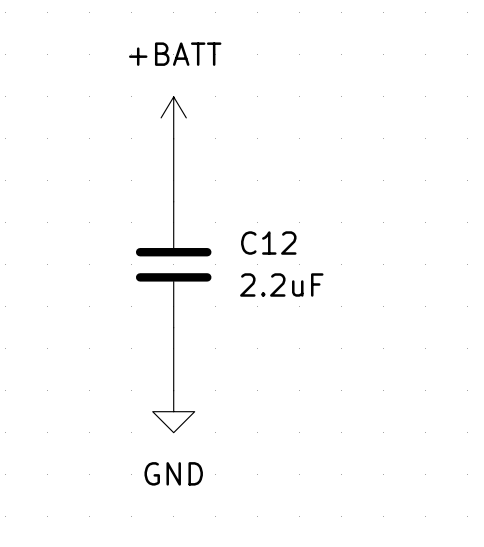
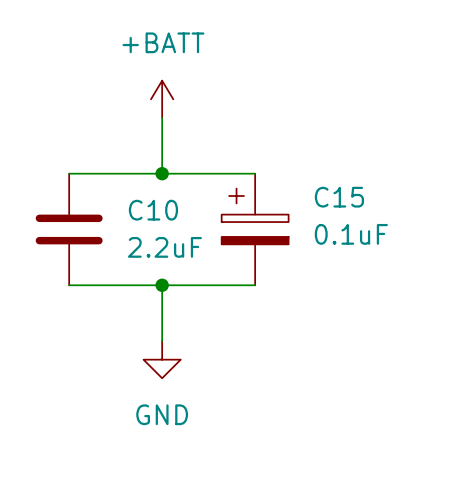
wire: none -> (69, 173) (255, 173)
junction: none -> (162, 173)
C10: none -> 2.2uF (69, 229)
C12: 2.2uF (173, 264) -> none
C15: none -> 0.1uF (255, 229)
wire: none -> (69, 285) (255, 285)
junction: none -> (162, 285)

